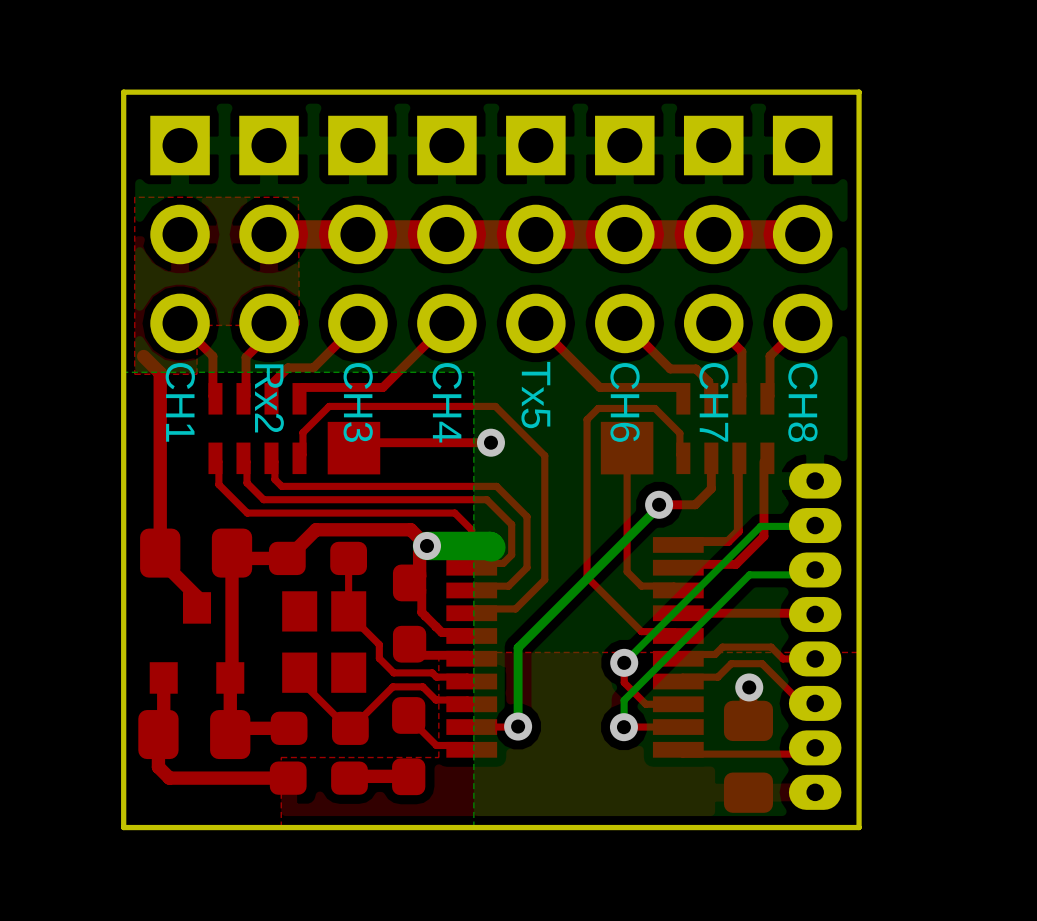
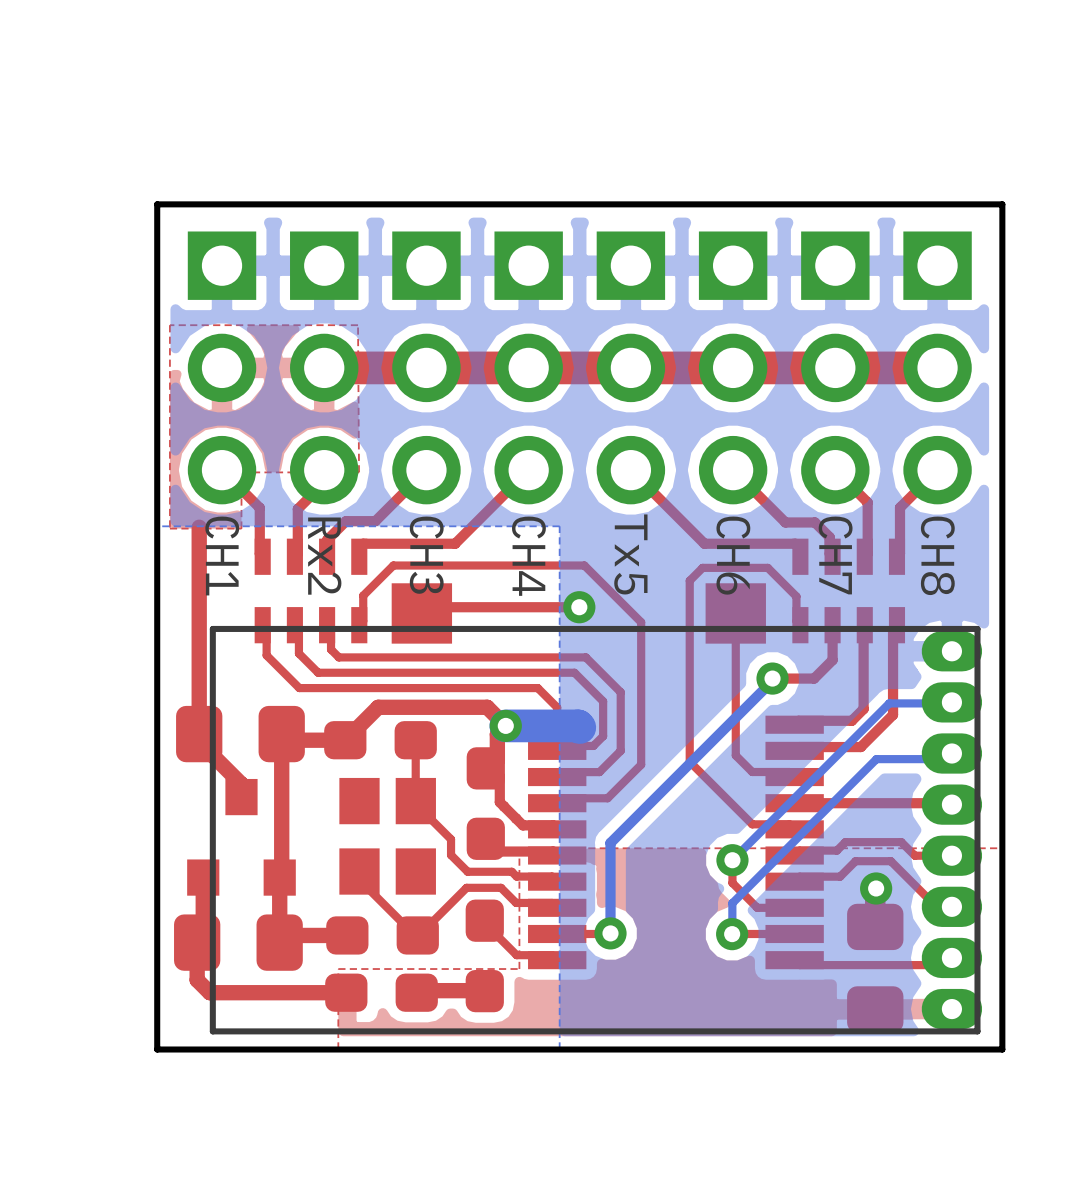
top track: (143, 356) (160, 373) -> none
part: none -> (595, 830)
part: (815, 636) -> none

